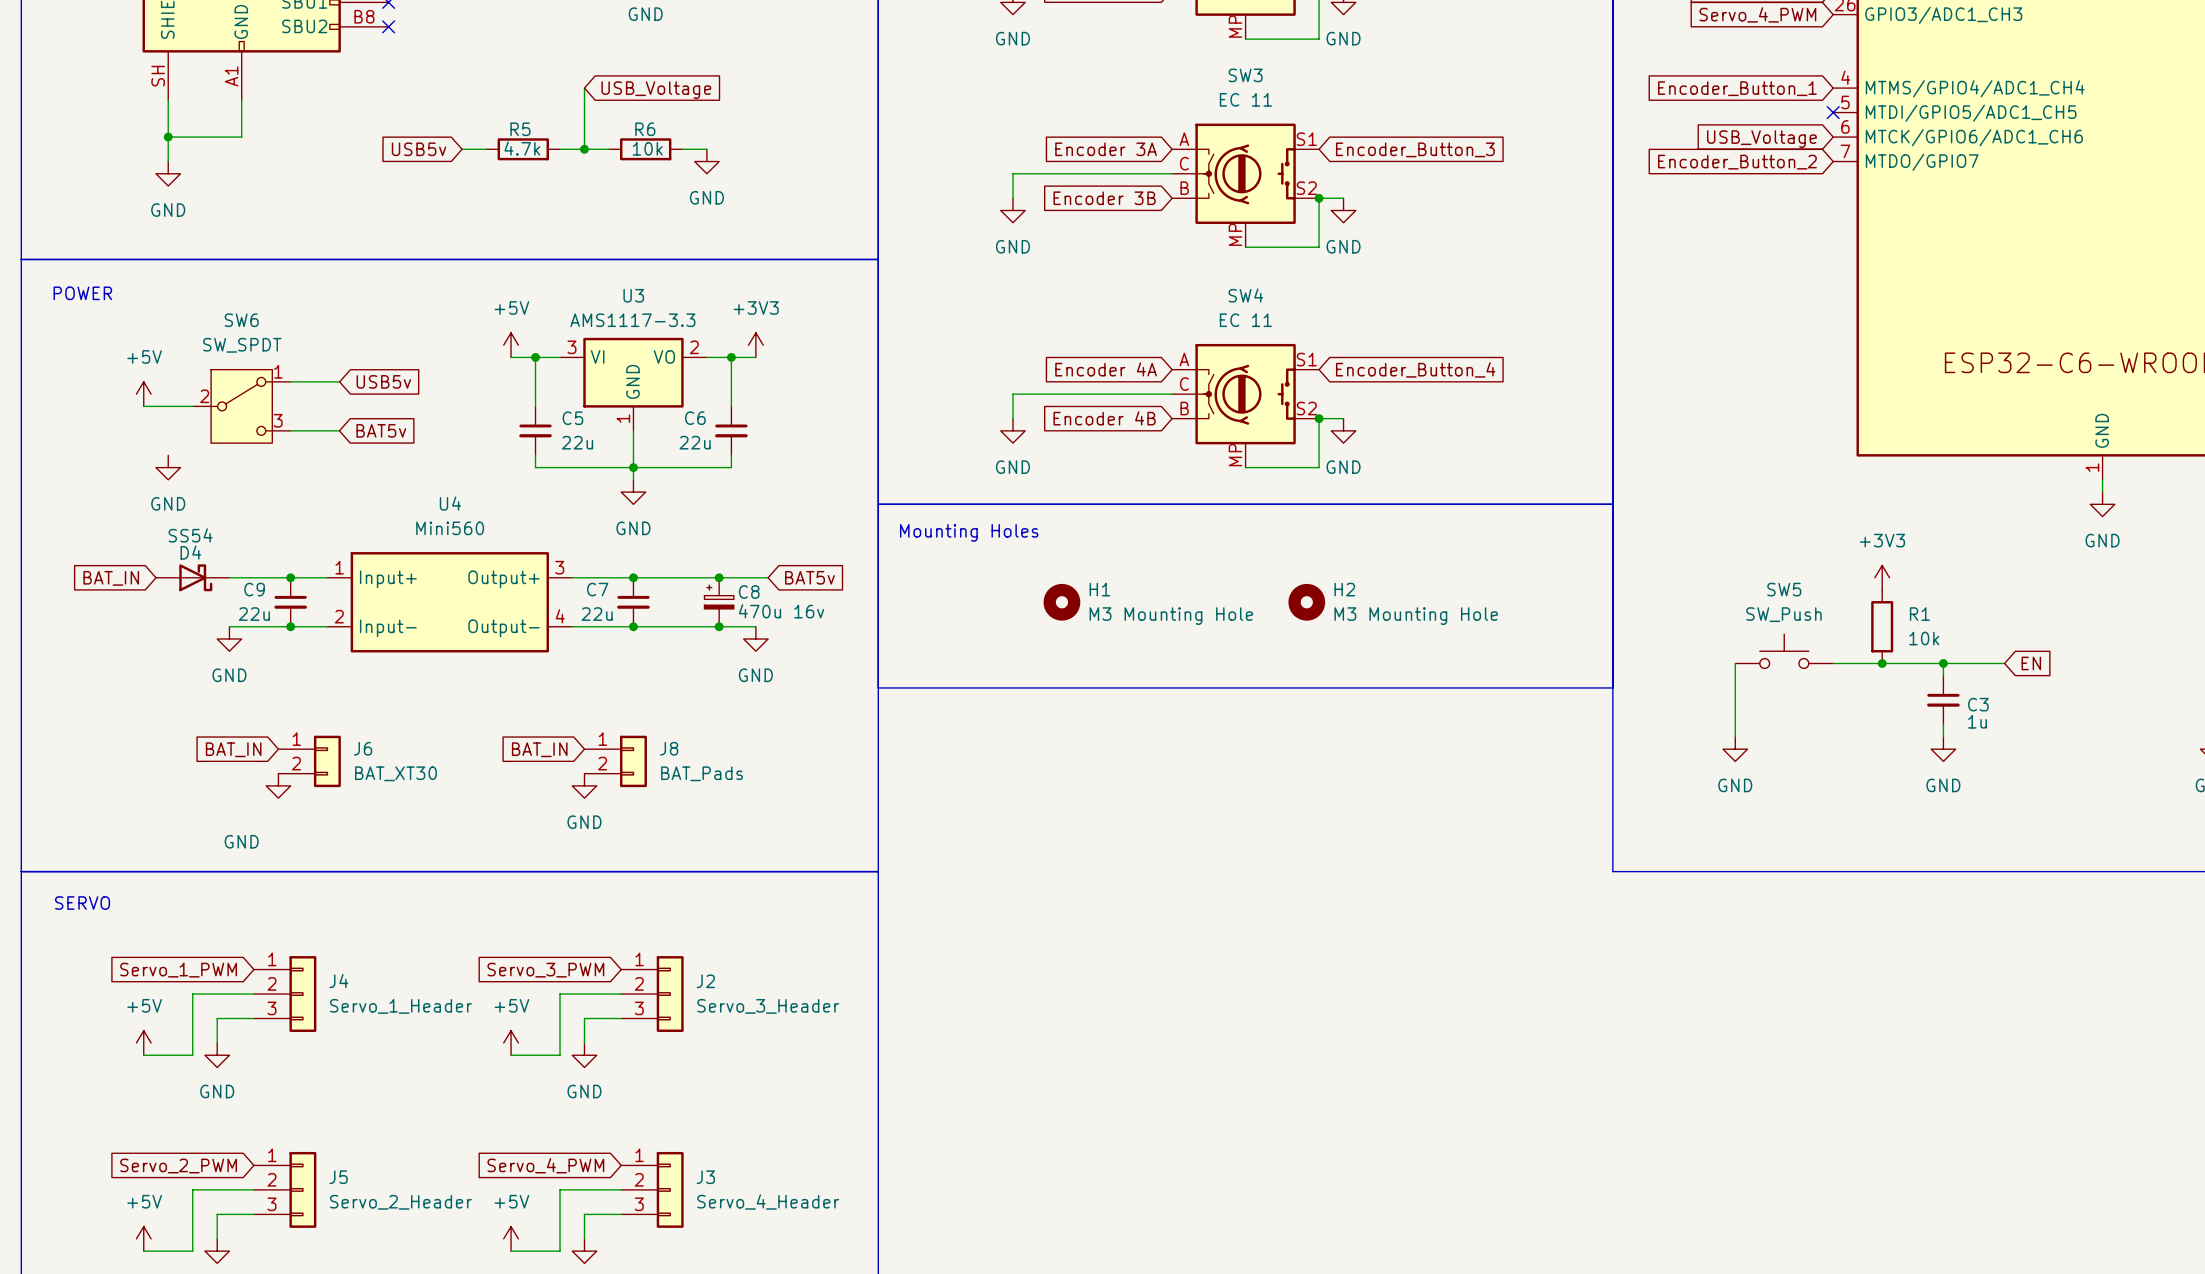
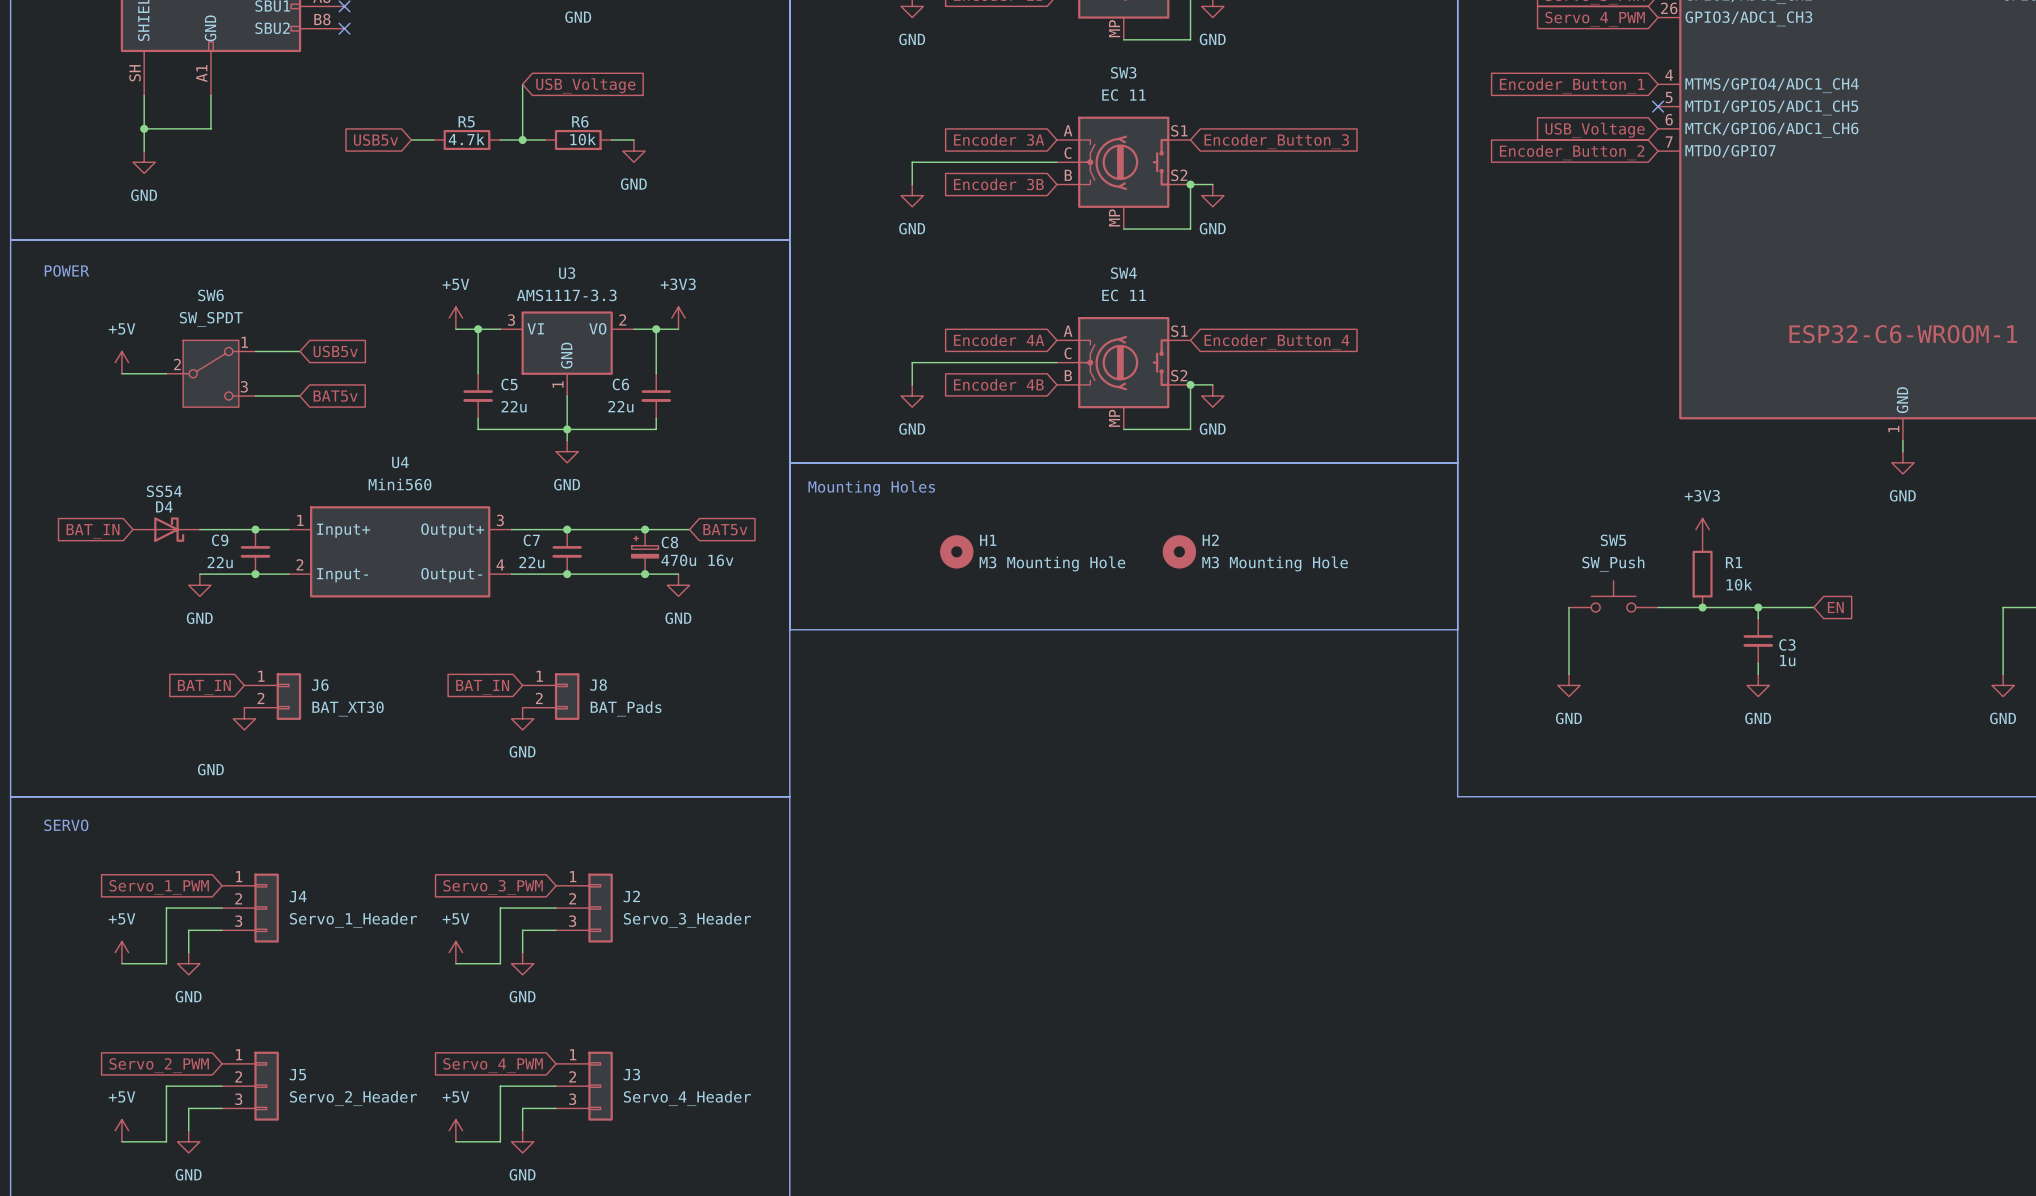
power symbol: GND (168, 467) -> none

